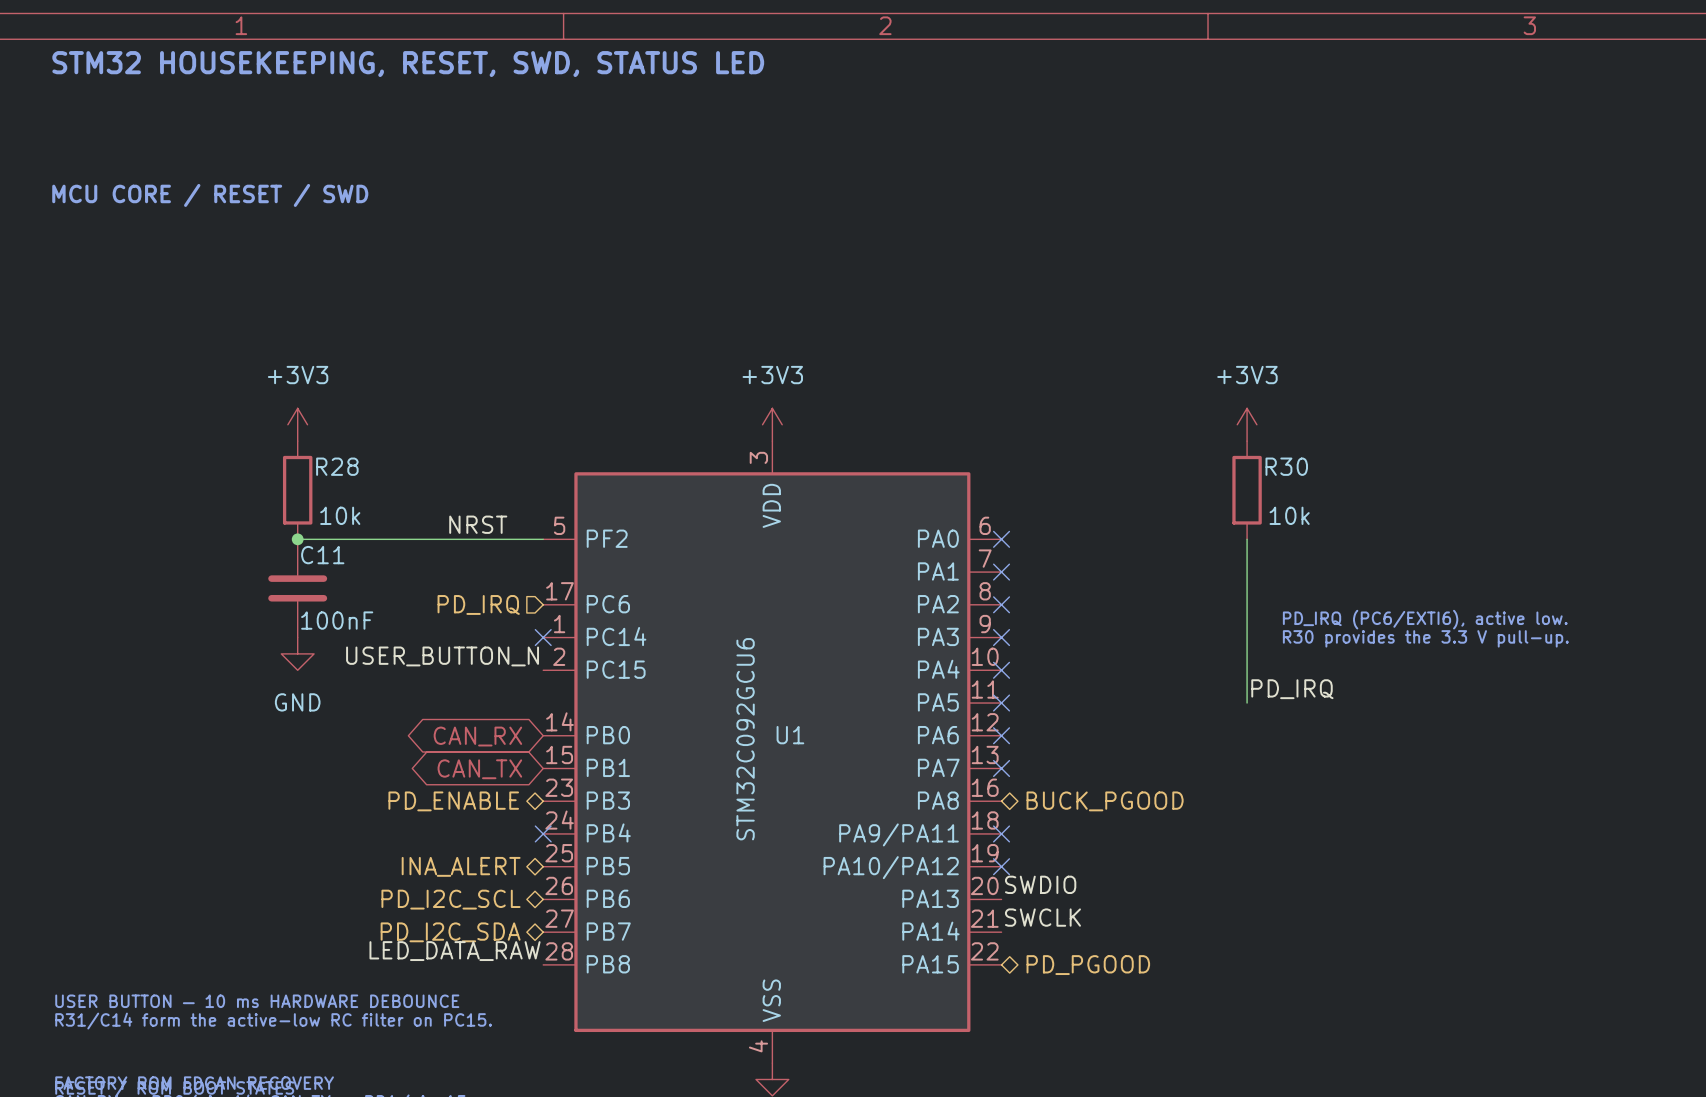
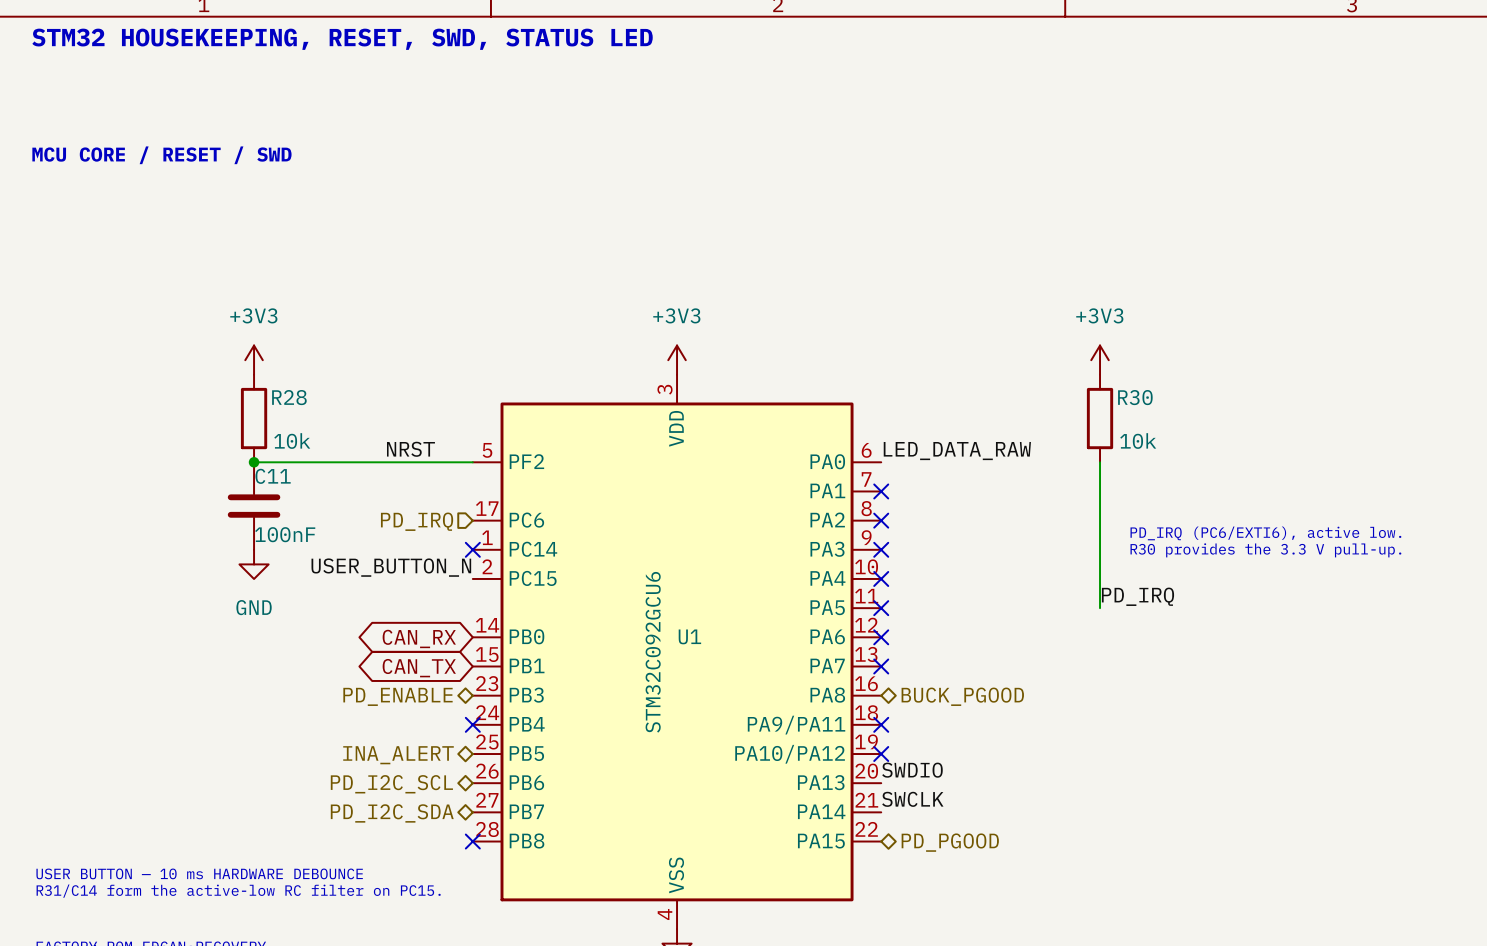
label: none -> LED_DATA_RAW (957, 451)
no-connect mark: (1001, 539) -> none
label: LED_DATA_RAW (455, 951) -> none
no-connect mark: none -> (472, 841)

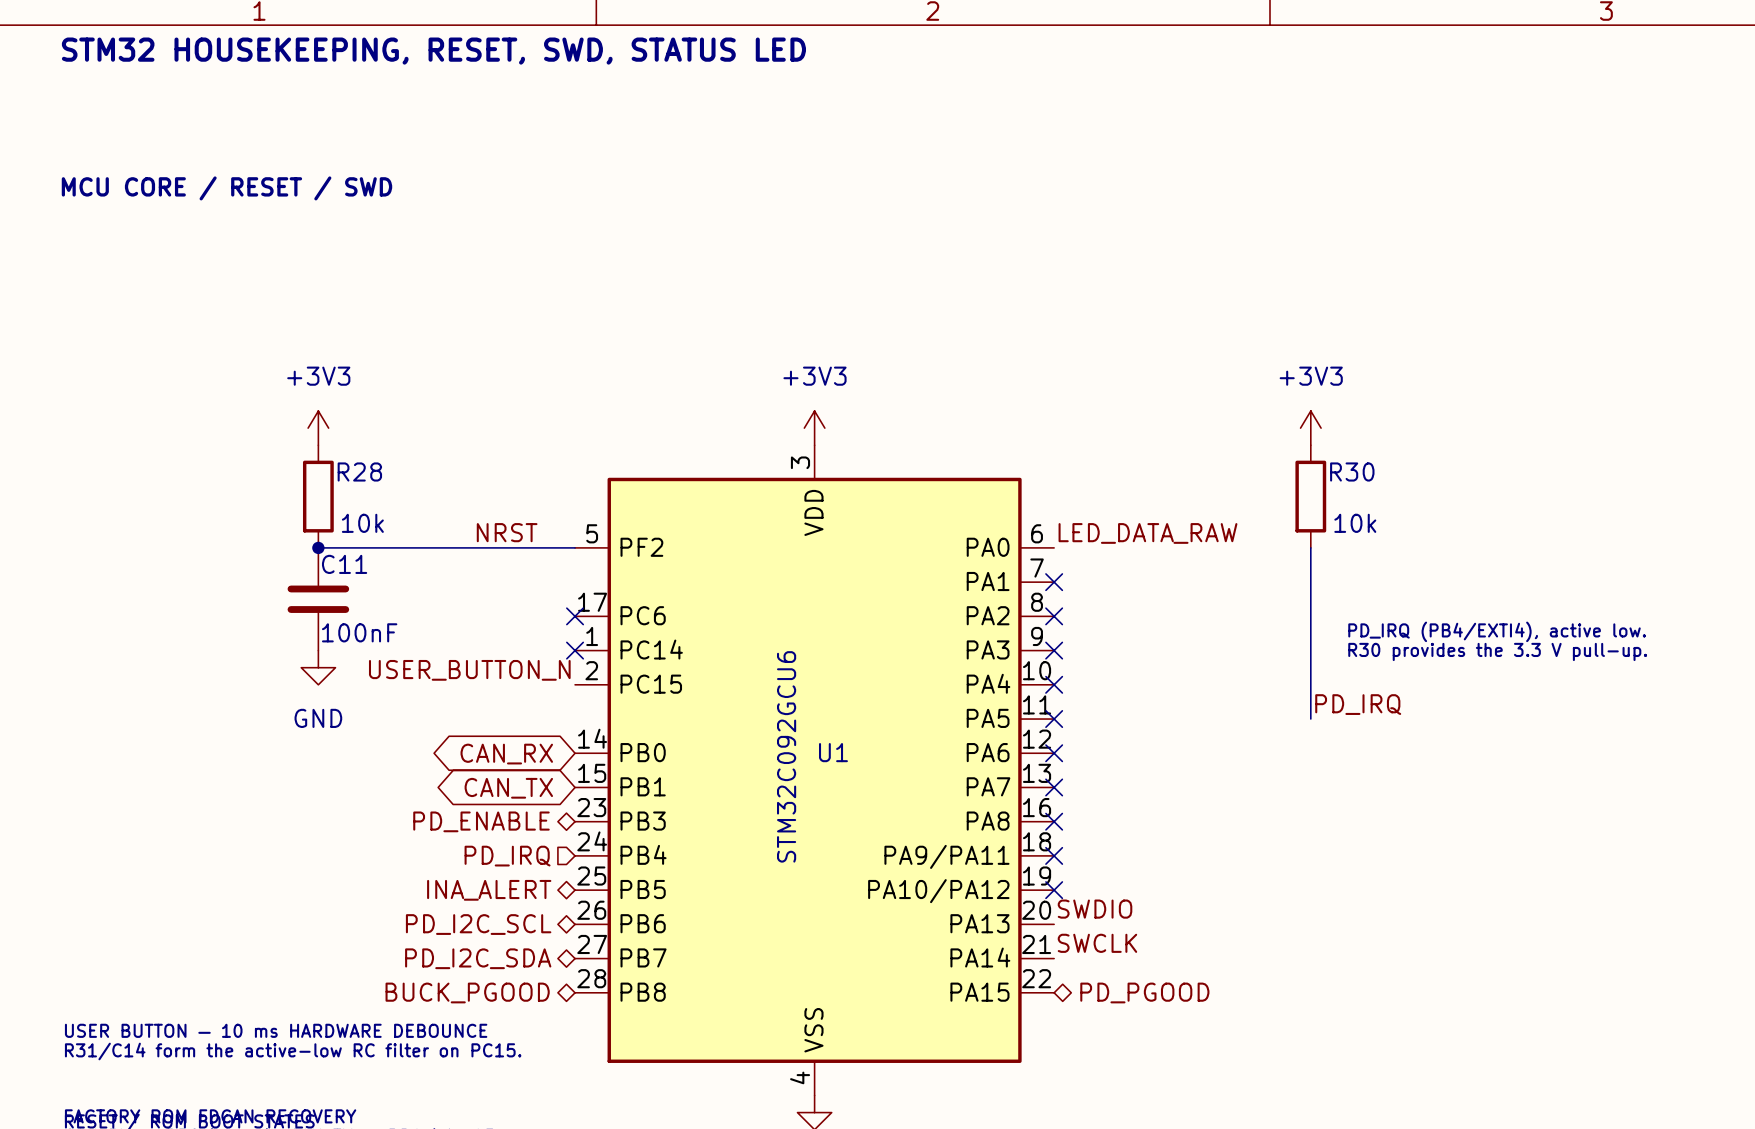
no-connect mark: none -> (575, 616)
hierarchical label position: PD_IRQ (417, 521) -> PD_IRQ (507, 856)
text: PD_IRQ (PC6/EXTI6), active low. (1265, 533) -> PD_IRQ (PB4/EXTI4), active low. (1497, 631)
no-connect mark: none -> (1054, 821)
hierarchical label: BUCK_PGOOD (962, 696) -> none
no-connect mark: (472, 724) -> none
no-connect mark: (472, 841) -> none
hierarchical label: none -> BUCK_PGOOD (467, 992)

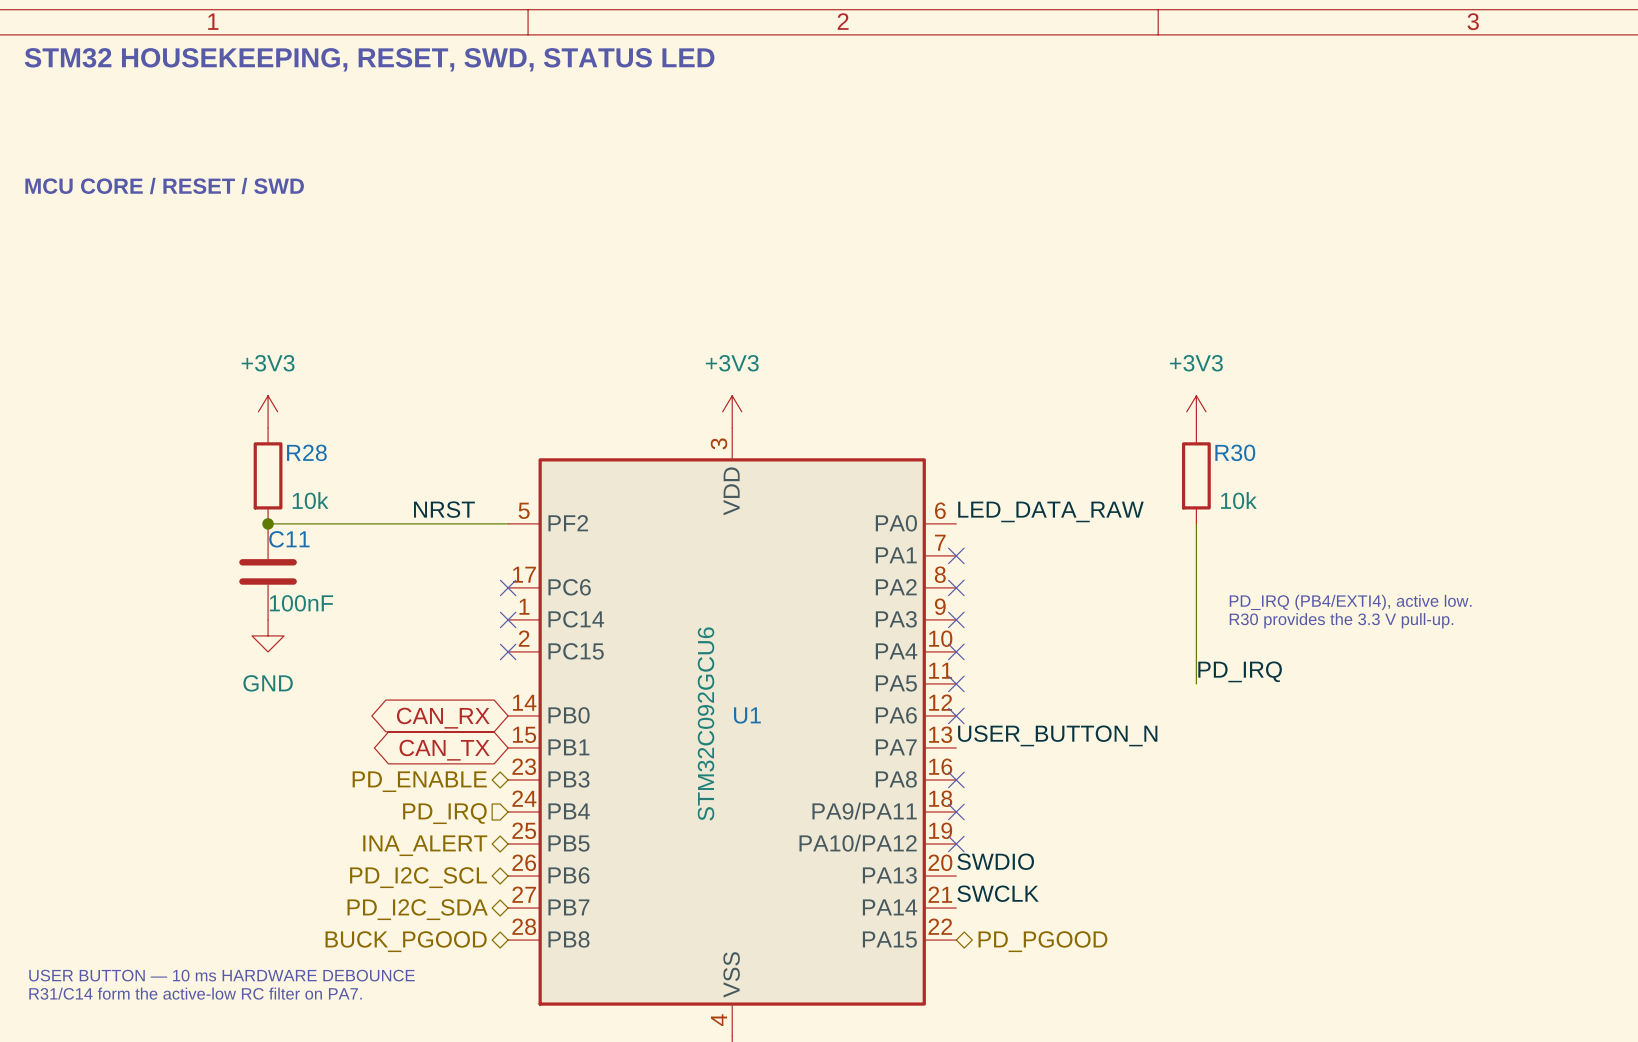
label: USER_BUTTON_N (469, 670) -> none
no-connect mark: none -> (508, 651)
label: none -> USER_BUTTON_N (1057, 735)
no-connect mark: (1054, 787) -> none
text: R31/C14 form the active-low RC filter on PC15. (293, 1051) -> R31/C14 form the active-low RC filter on PA7. (195, 993)

